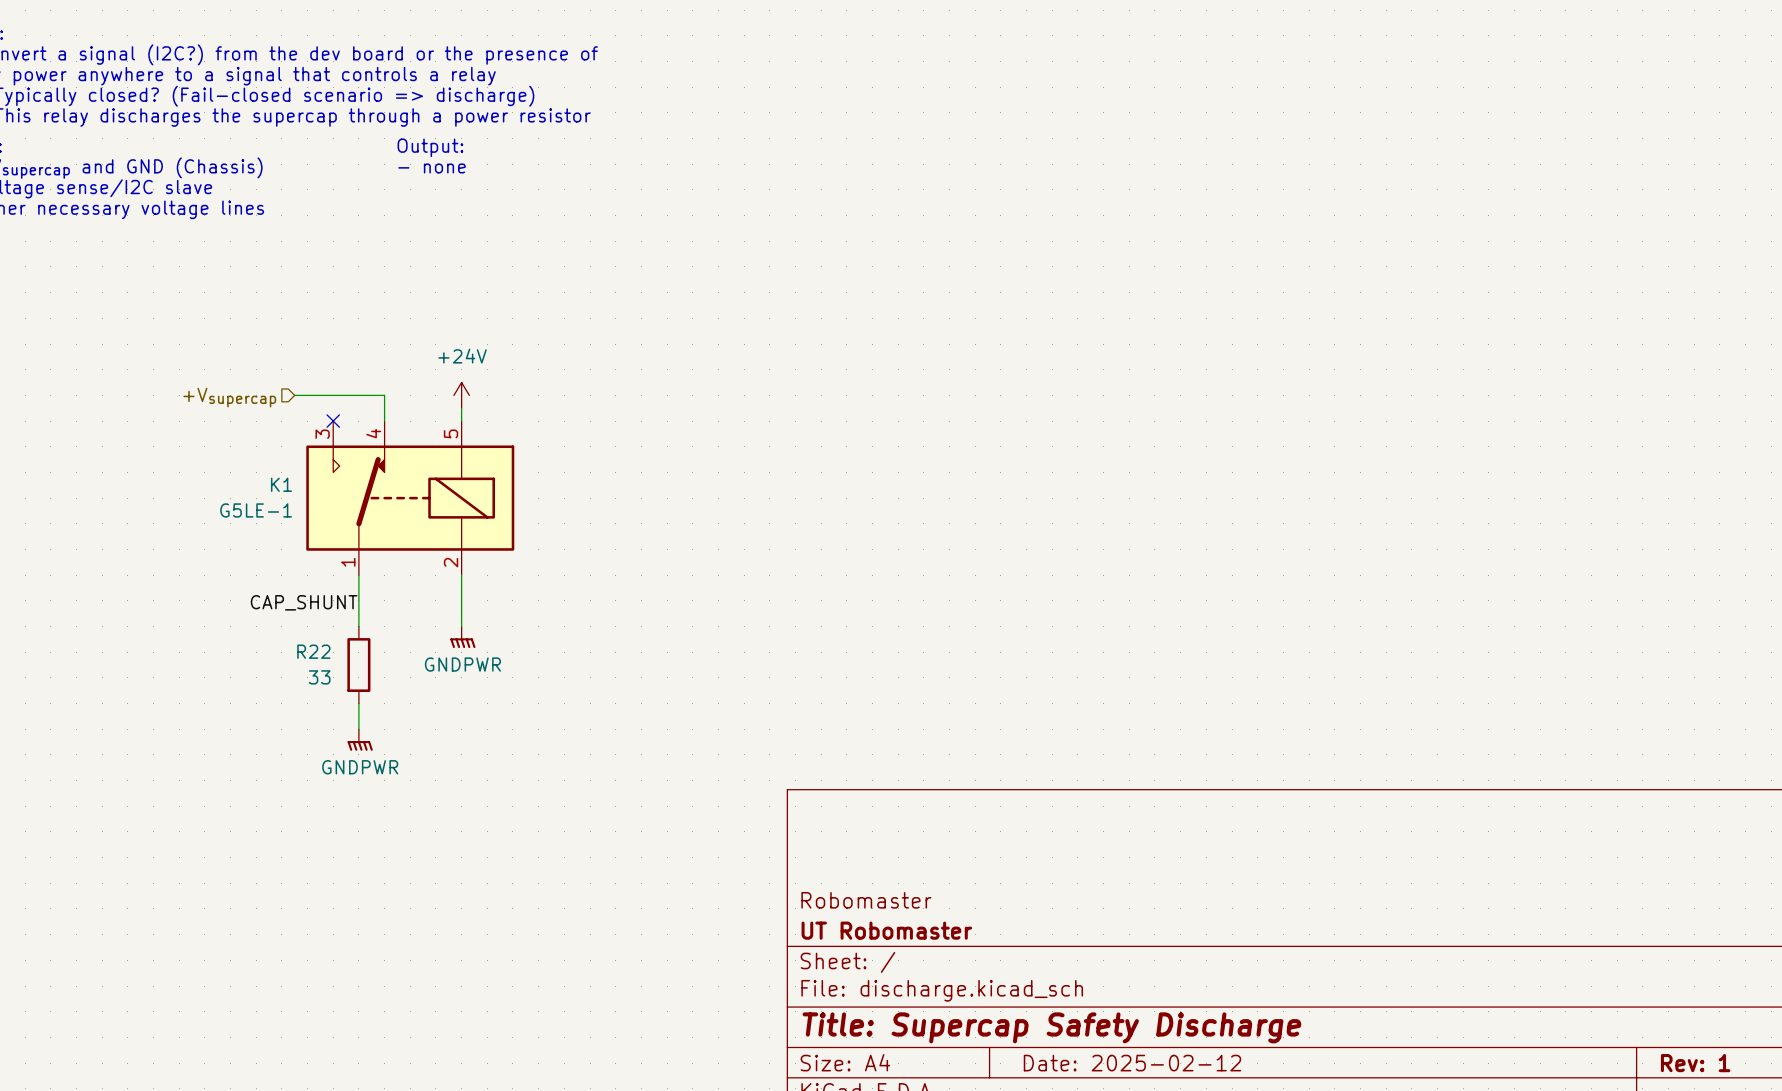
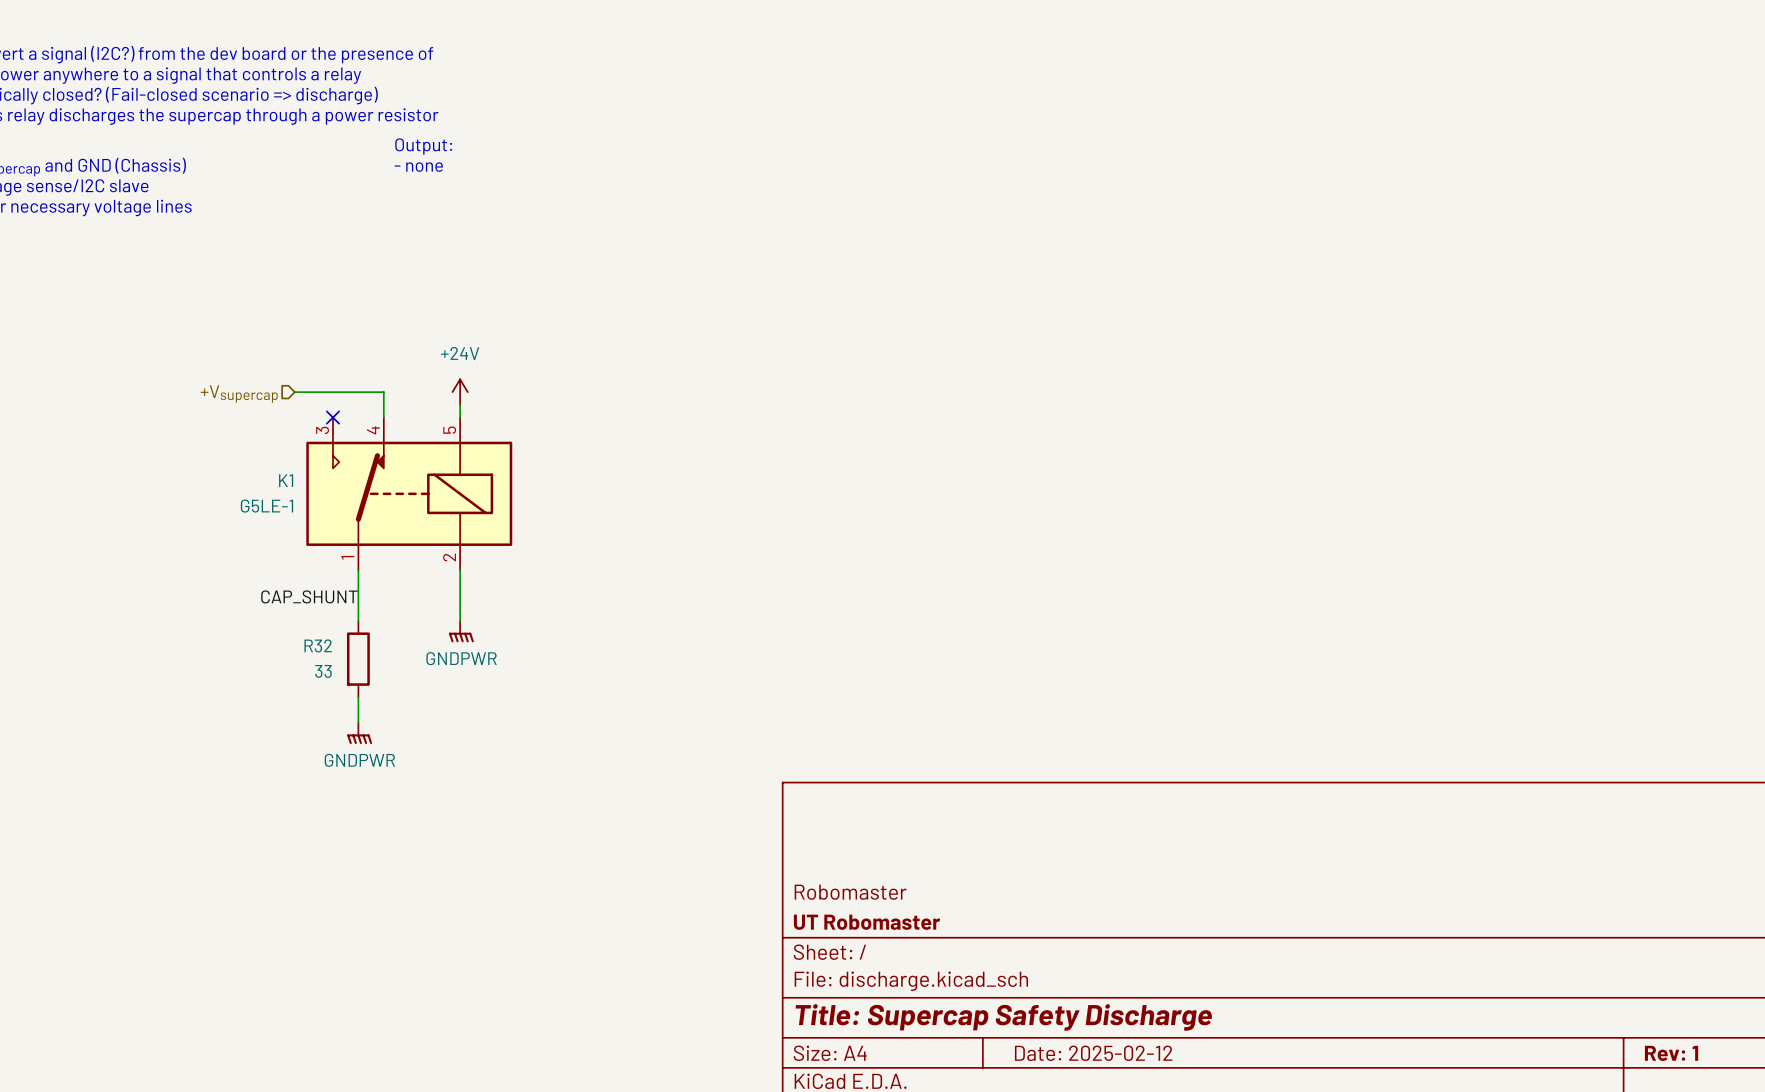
R22 name: R22 (313, 651) -> R32 (318, 645)

